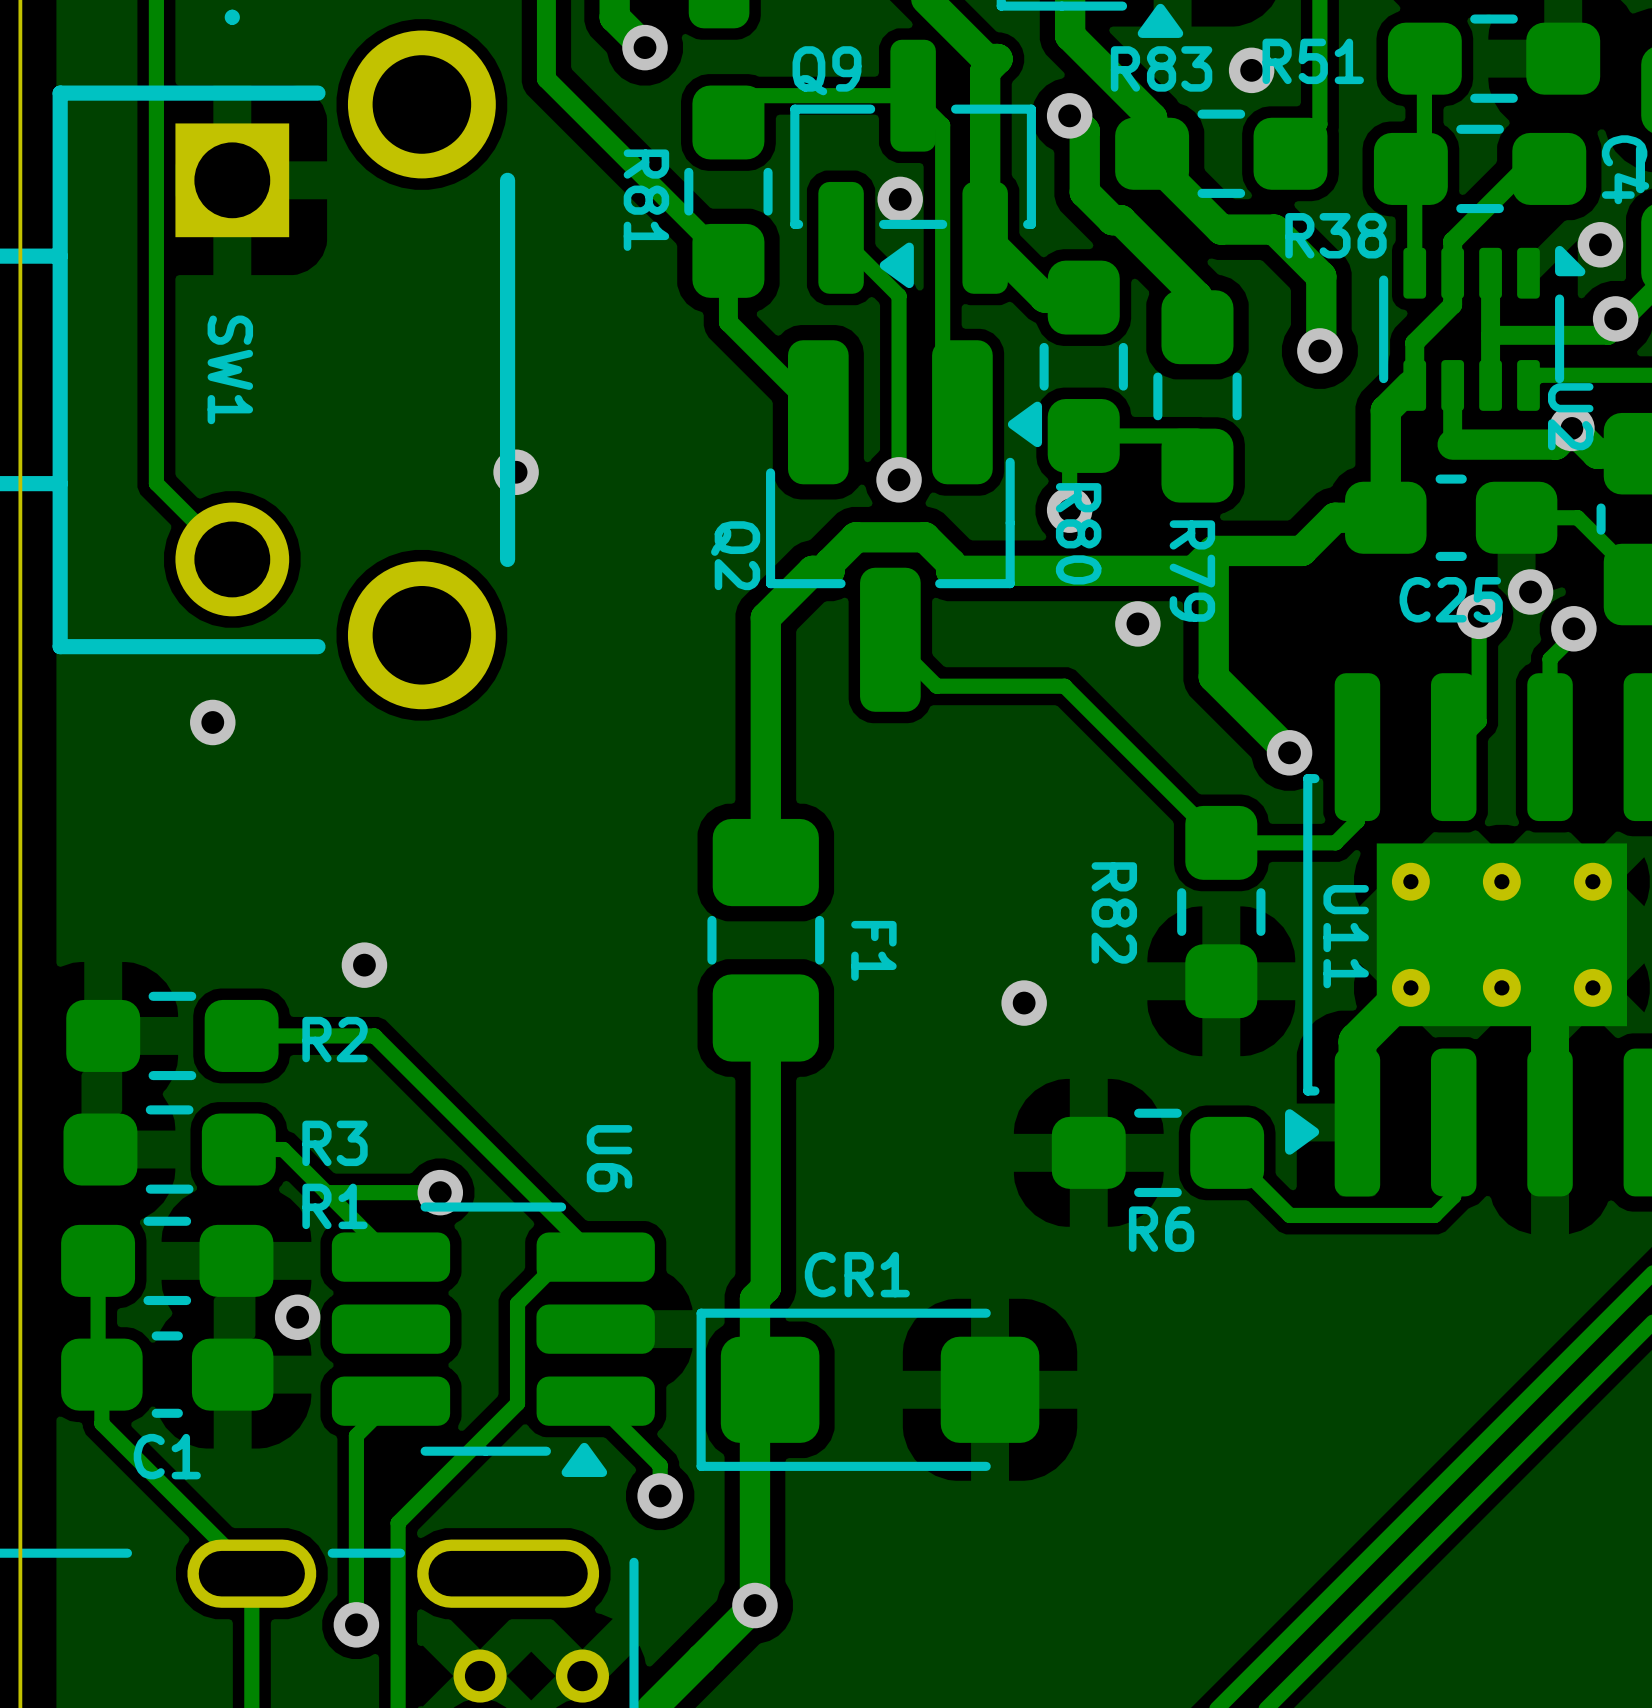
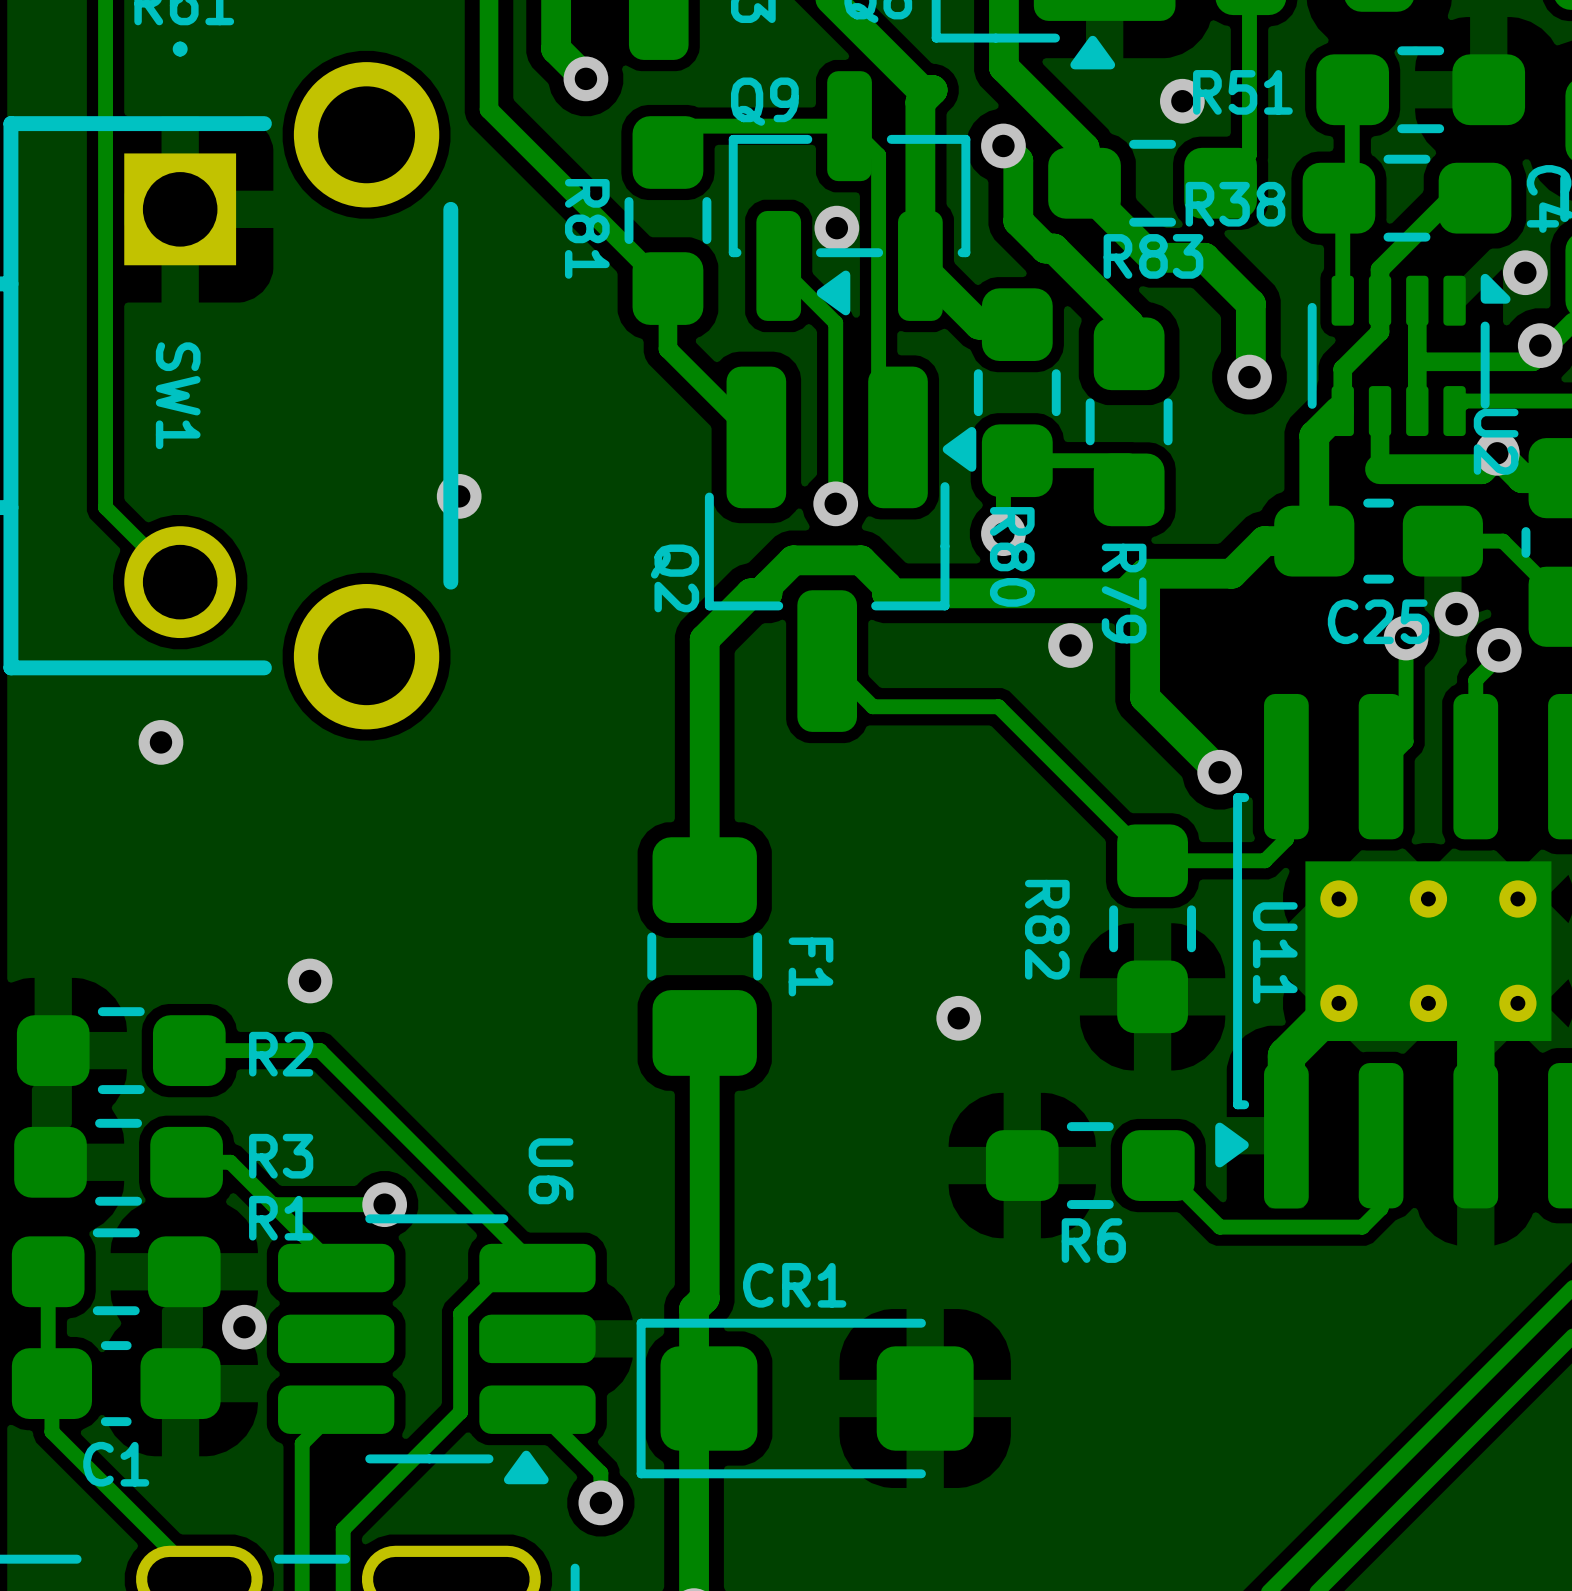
R83 name position: R83 (1161, 68) -> R83 (1153, 256)
R38 name position: R38 (1335, 235) -> R38 (1235, 204)

